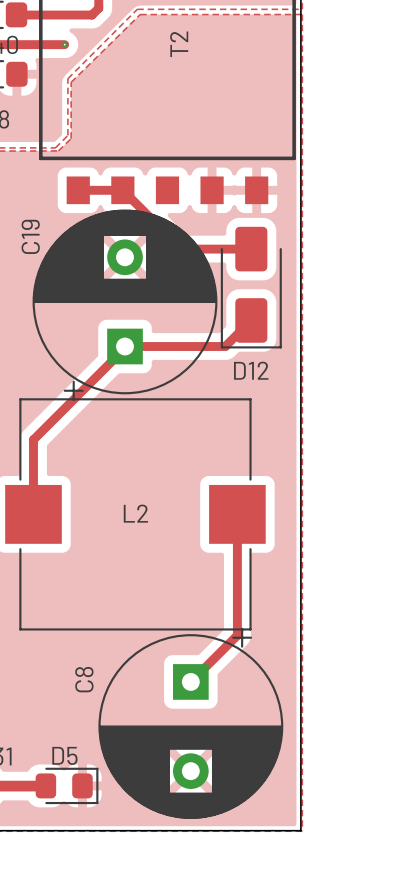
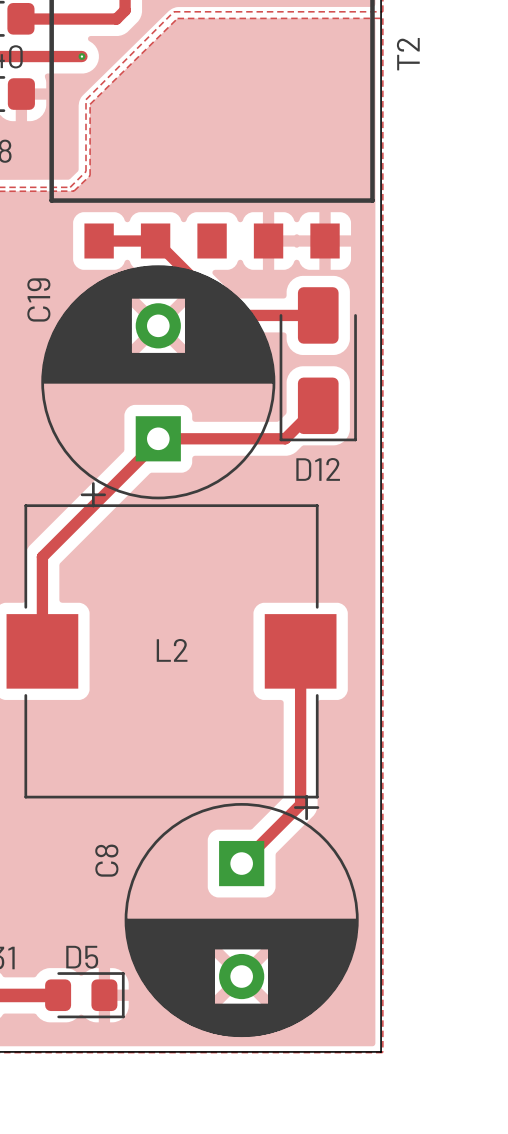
T2 name position: T2 (179, 44) -> T2 (408, 54)

